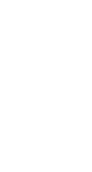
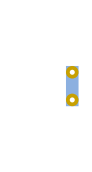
part: none -> (72, 86)

